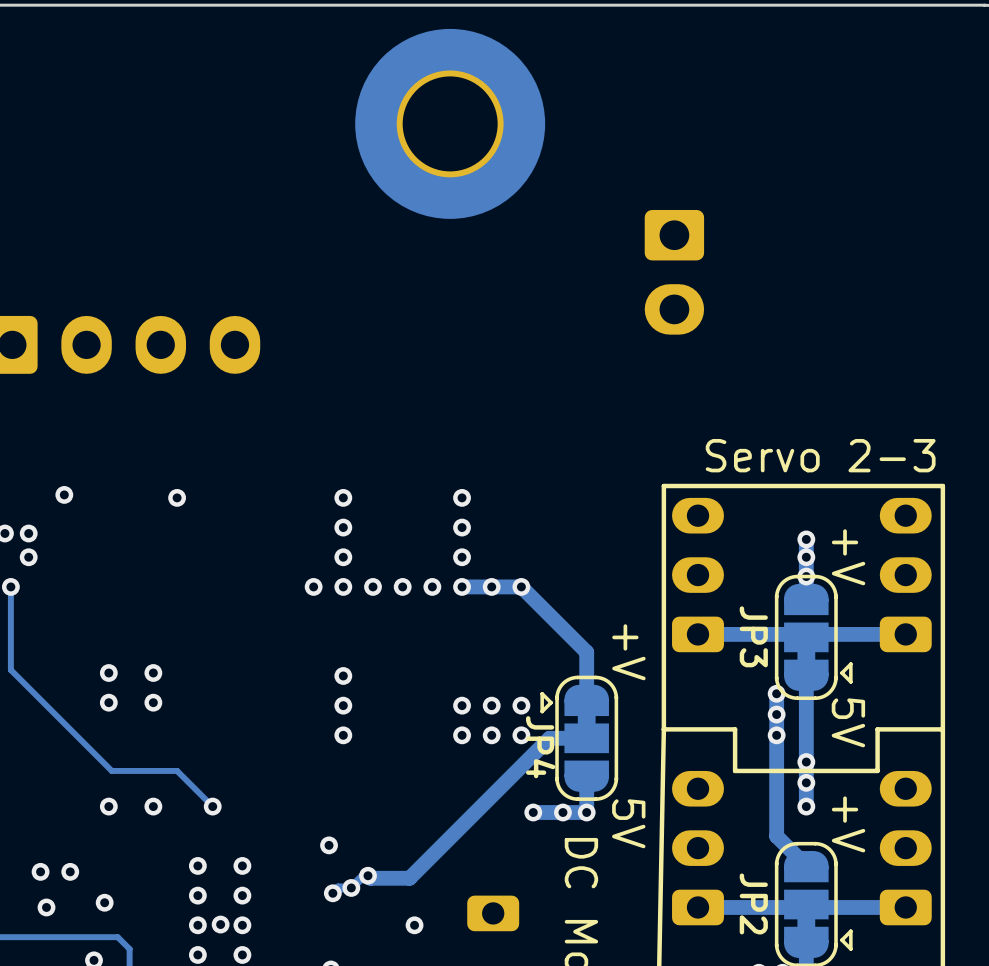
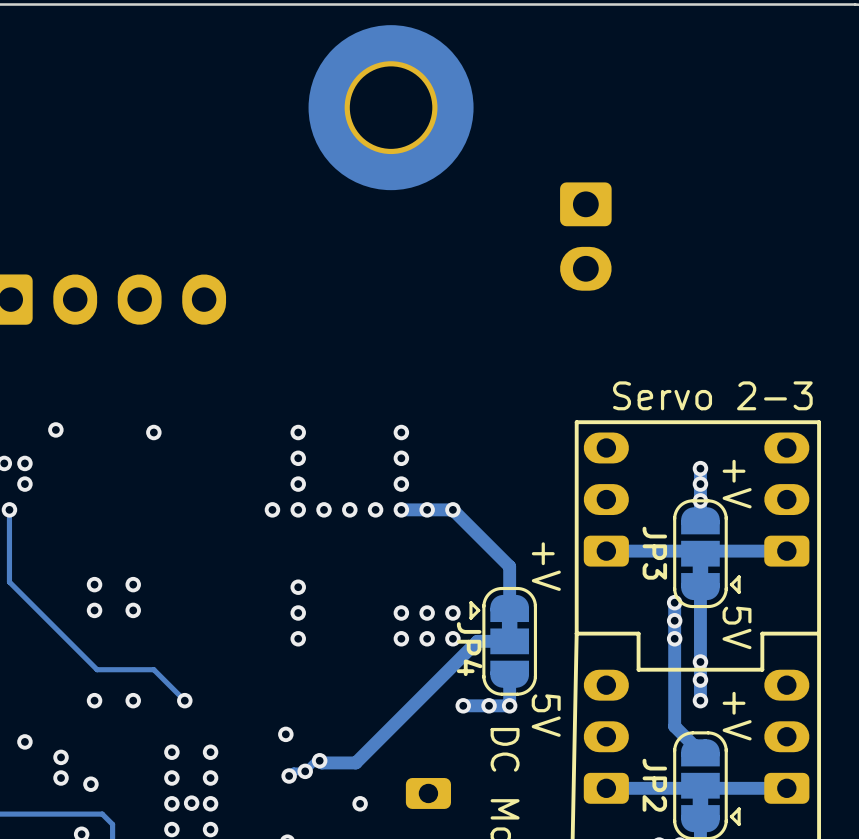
via: none -> (24, 741)
via: (40, 871) -> none
via: none -> (61, 778)
via: (46, 907) -> none

